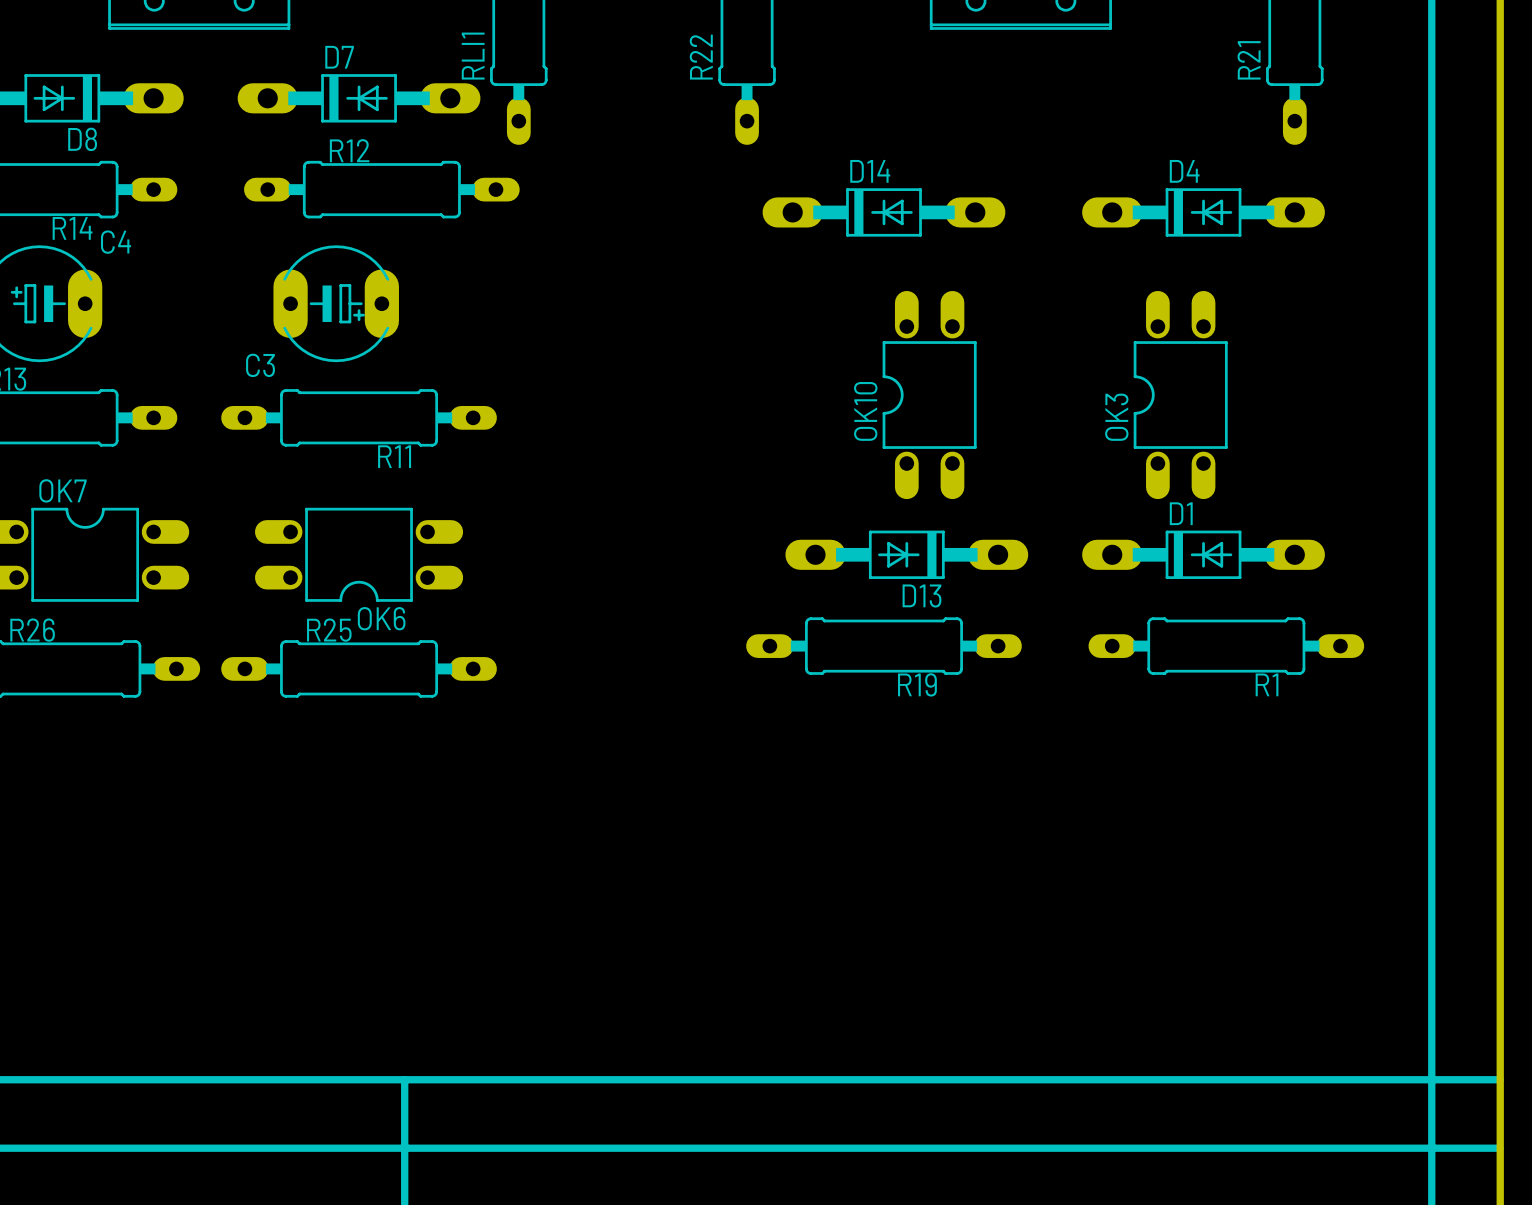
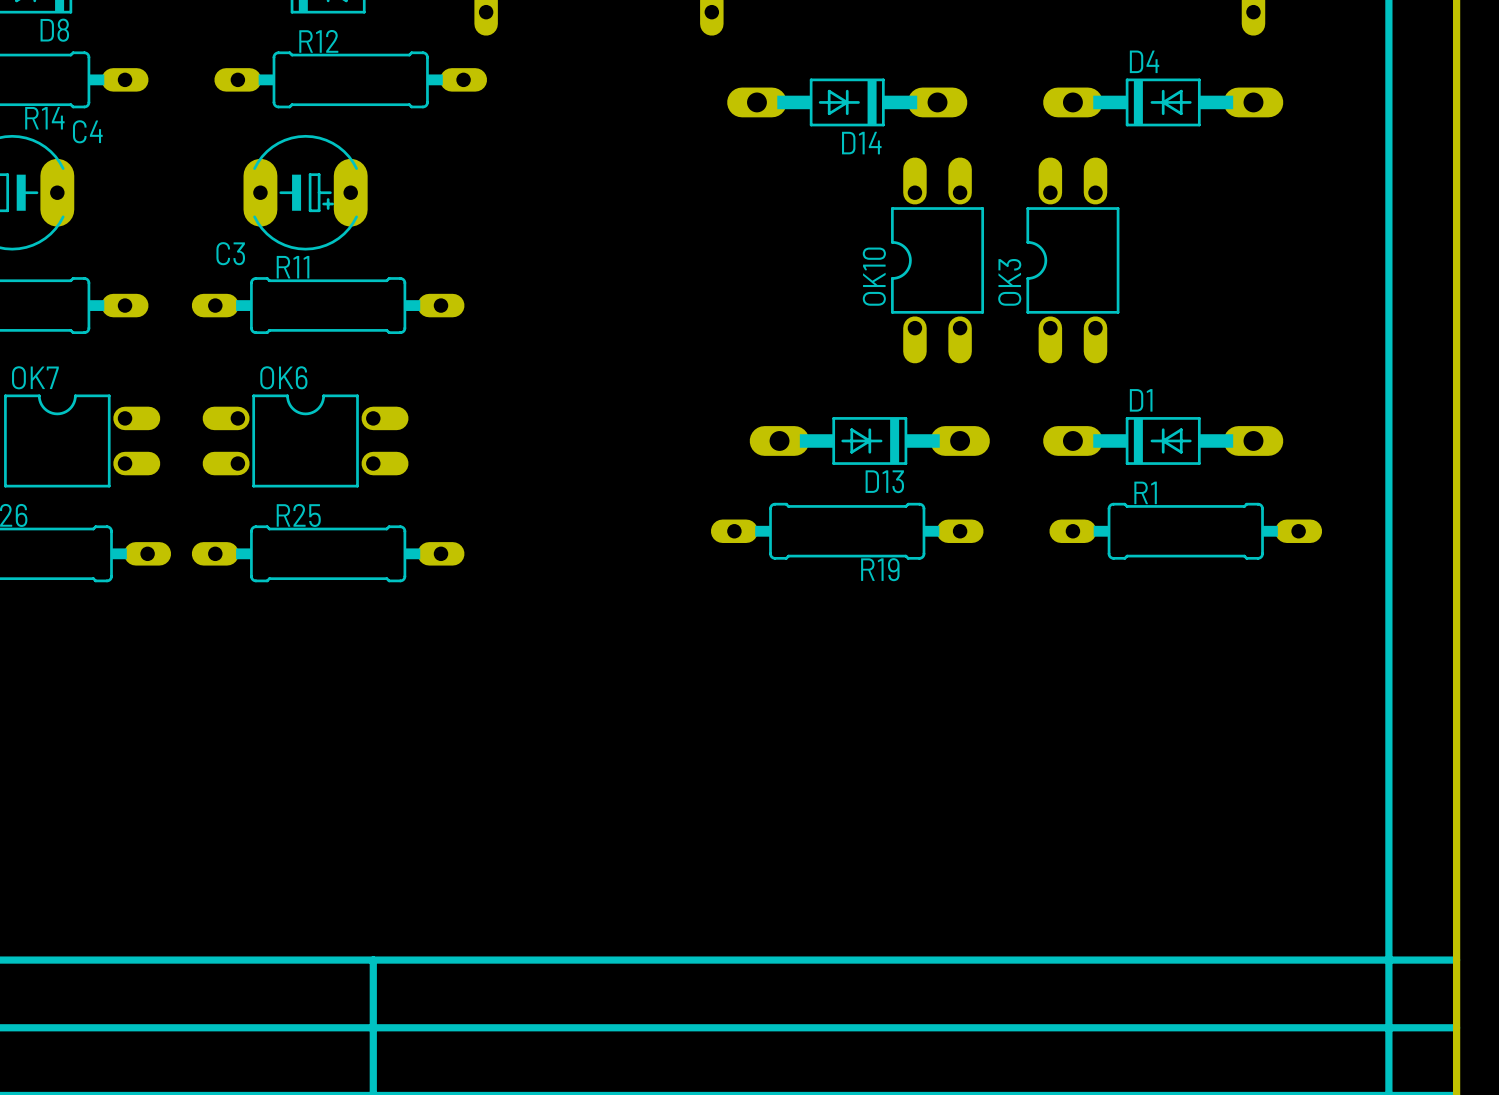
D14 rotation: 0° (883, 212) -> 180° (847, 102)
OK10 position: (929, 395) -> (937, 260)
OK3 position: (1180, 395) -> (1072, 260)
R11 name position: R11 (394, 456) -> R11 (293, 267)
OK6 rotation: 0° (359, 554) -> 180° (305, 440)
R1 name position: R1 (1267, 684) -> R1 (1145, 492)

